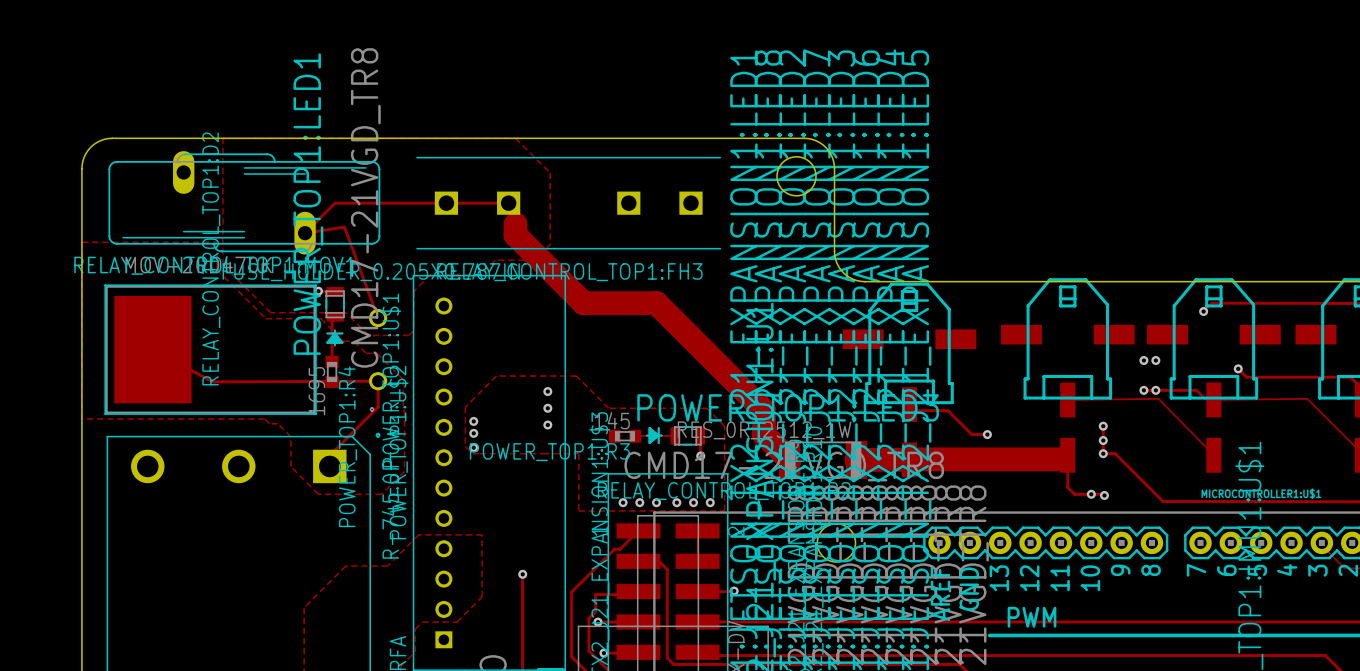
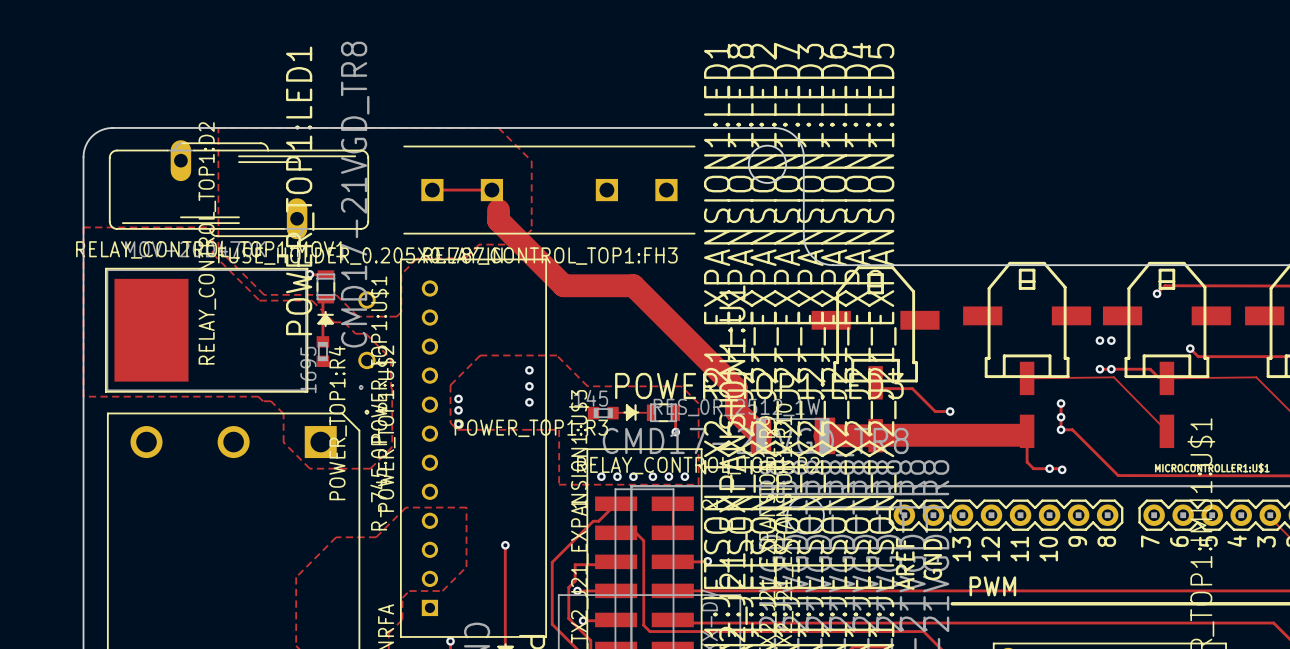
track: (446, 203) (335, 203) (305, 233) (344, 227) (378, 318) -> none
track: (152, 349) (212, 381) (378, 381) (378, 407) (326, 458) -> none

